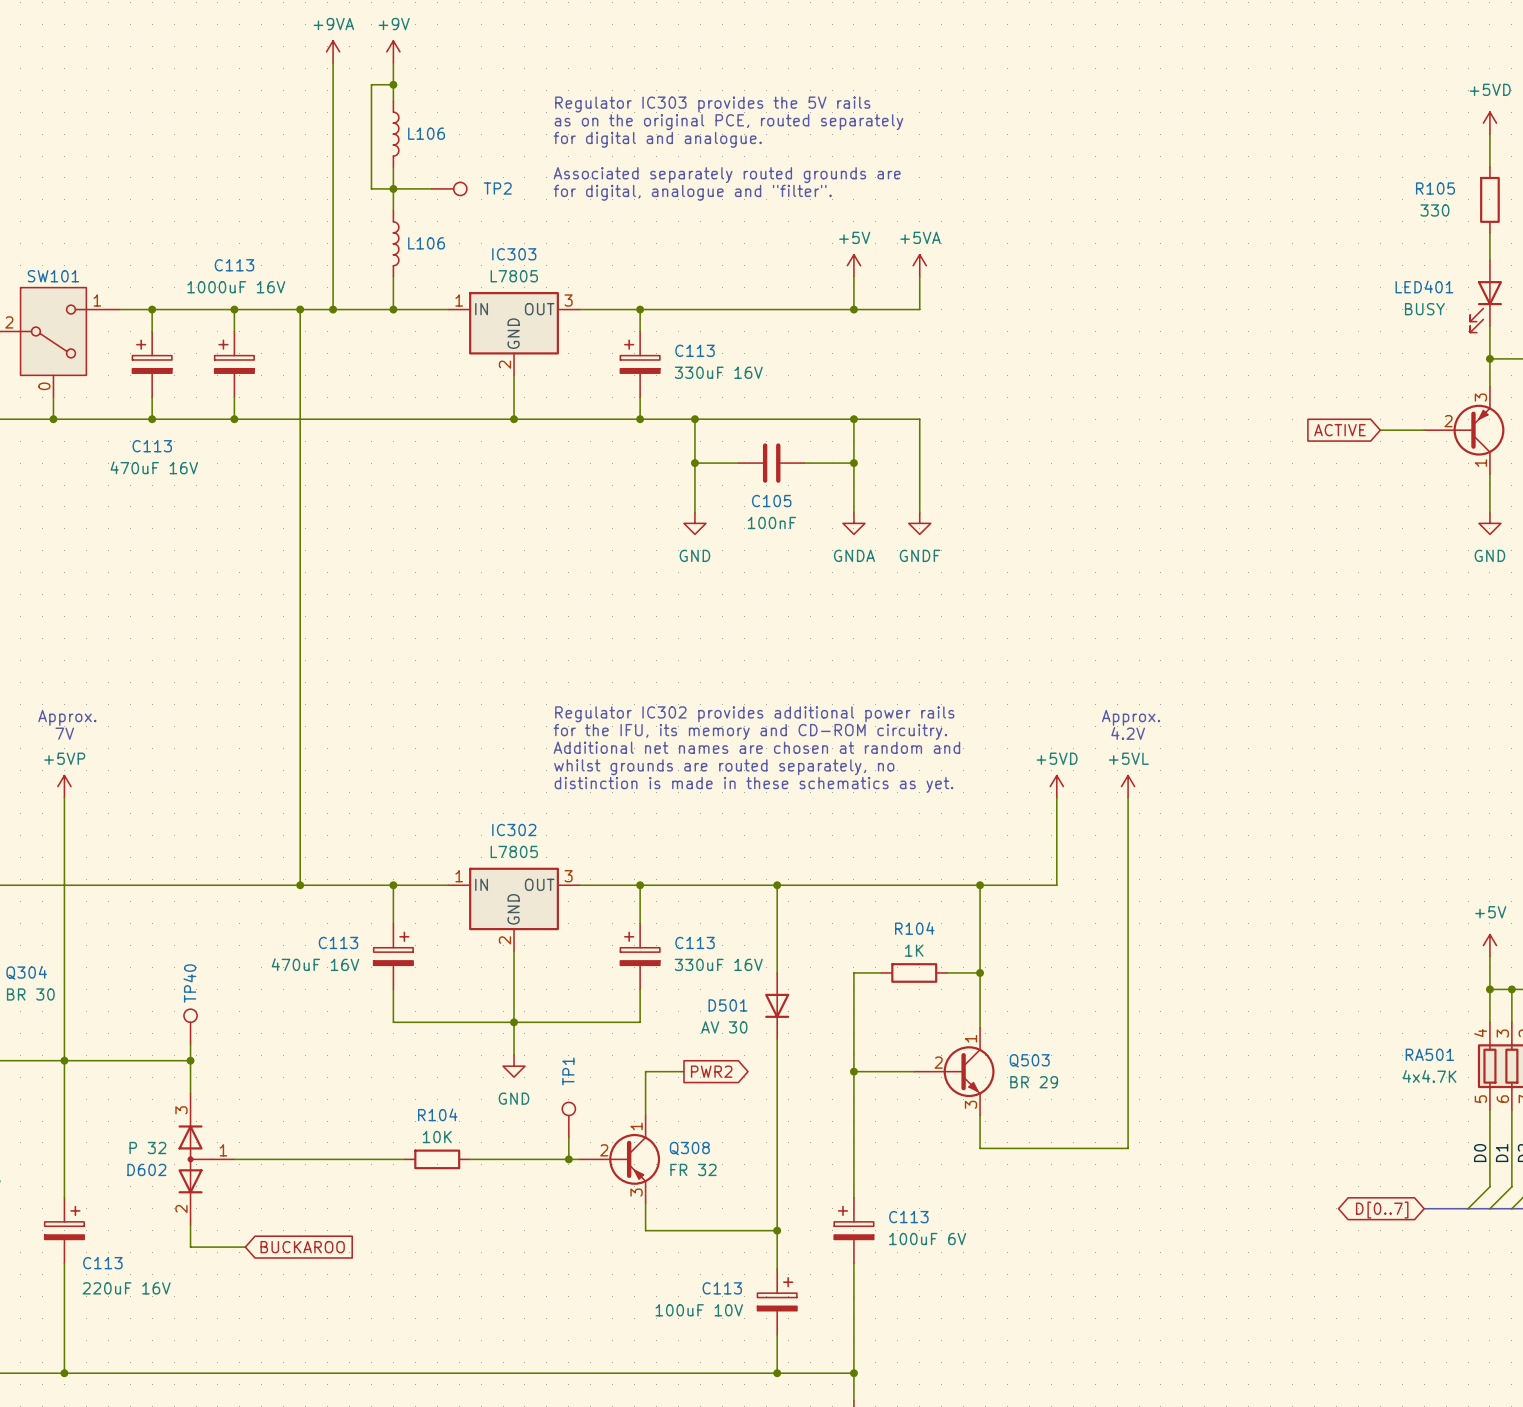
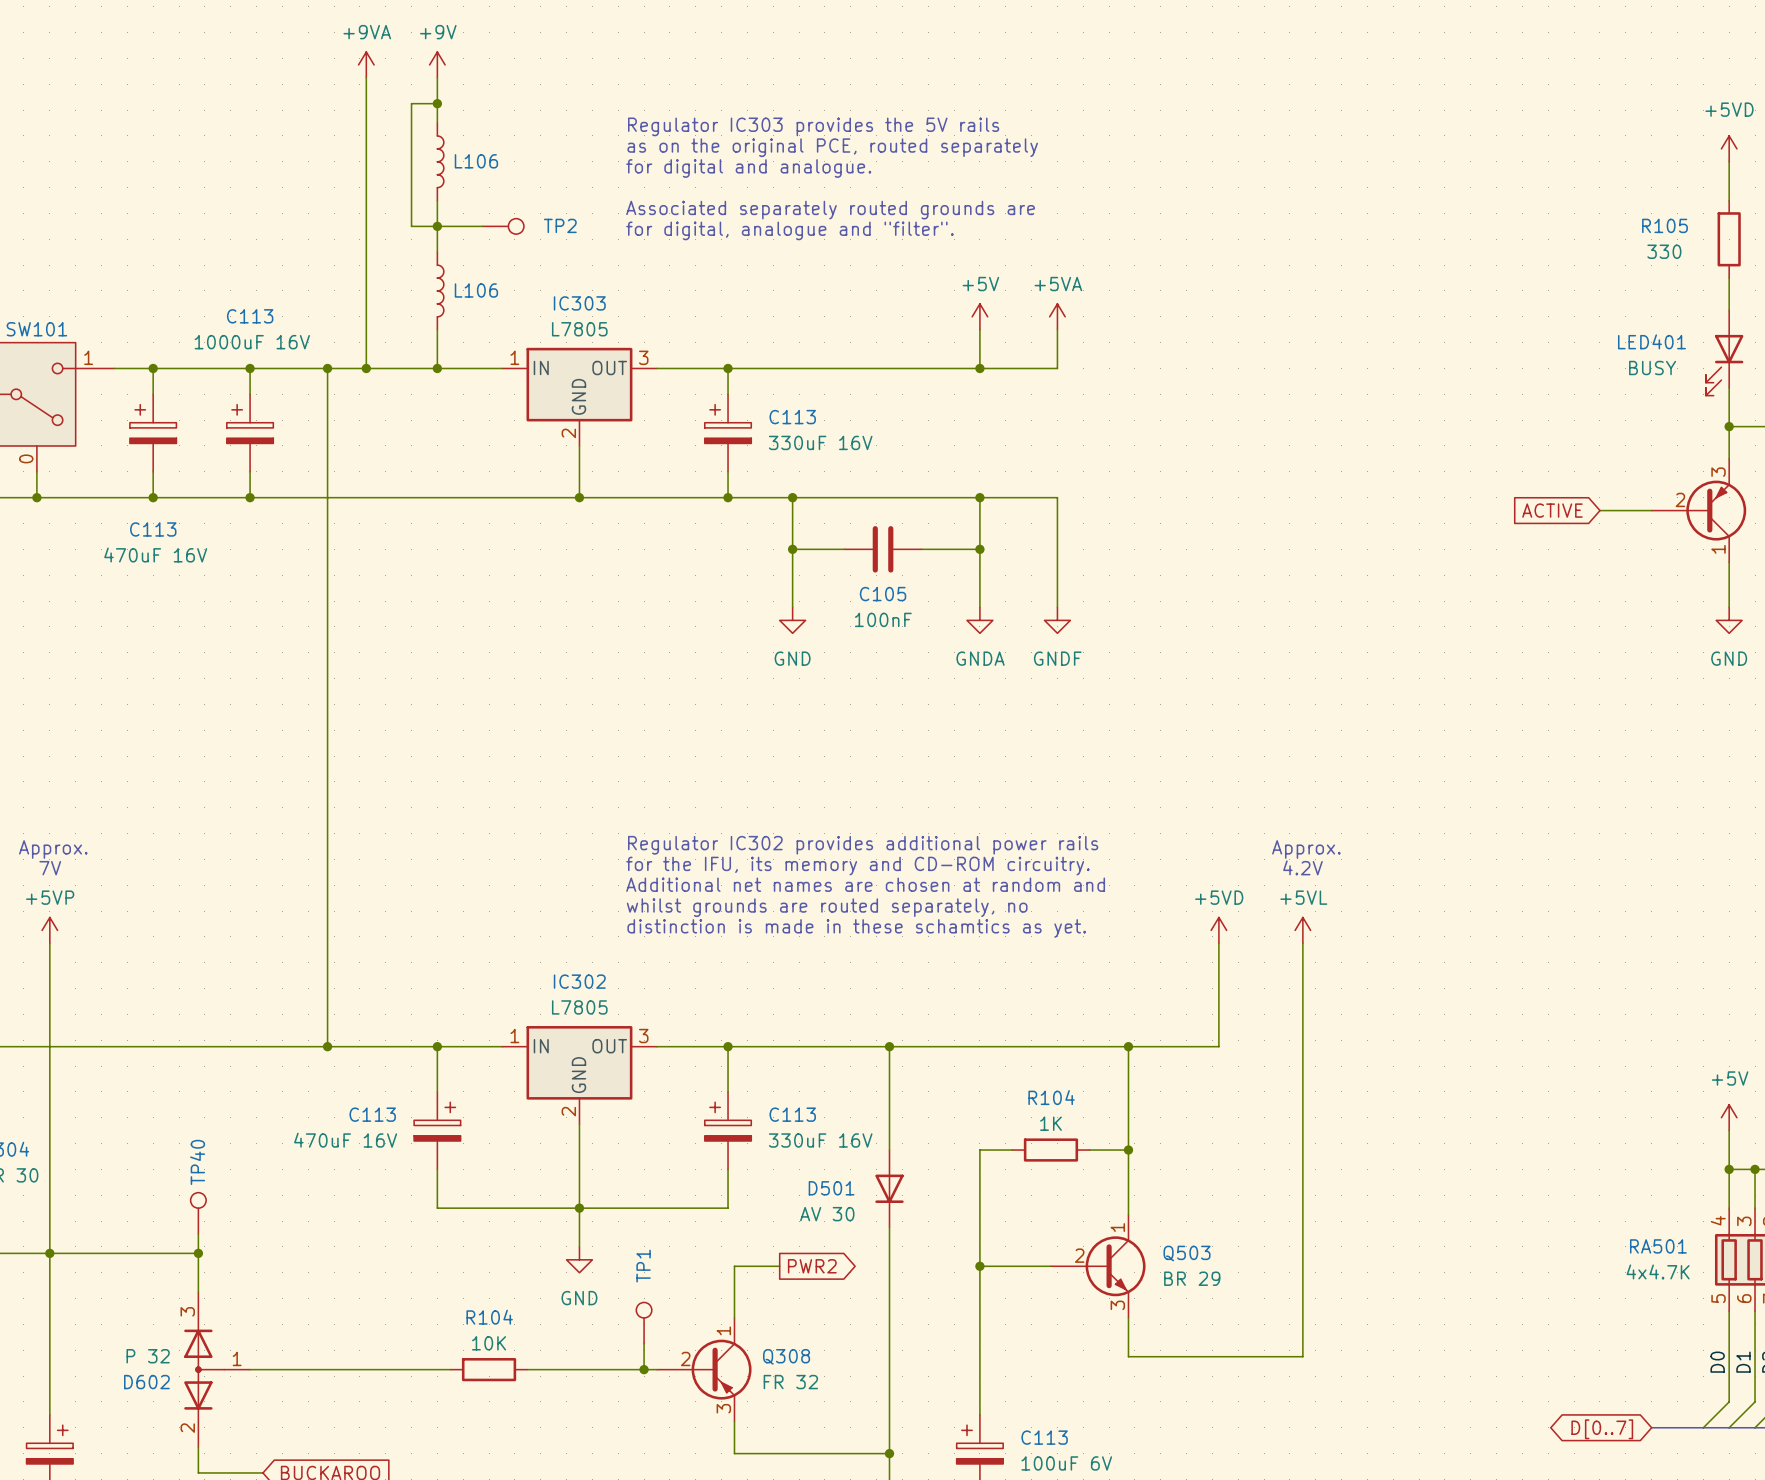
text: distinction is made in these schematics as yet. (754, 784) -> distinction is made in these schamtics as yet. (856, 928)

